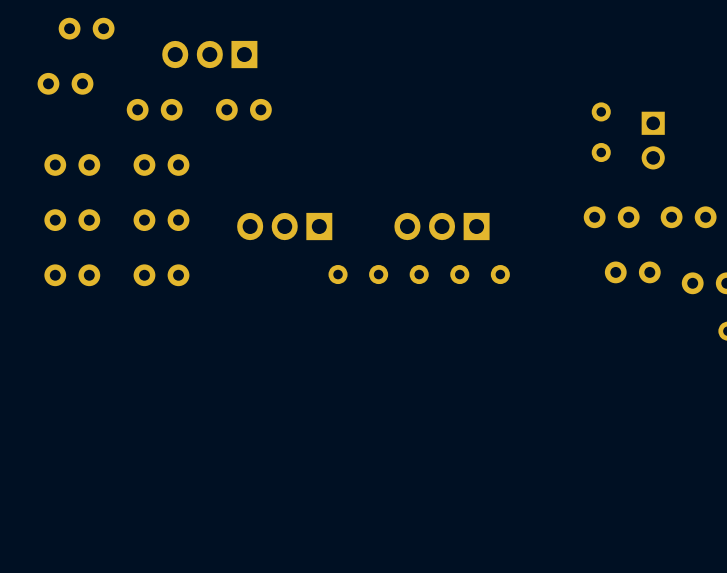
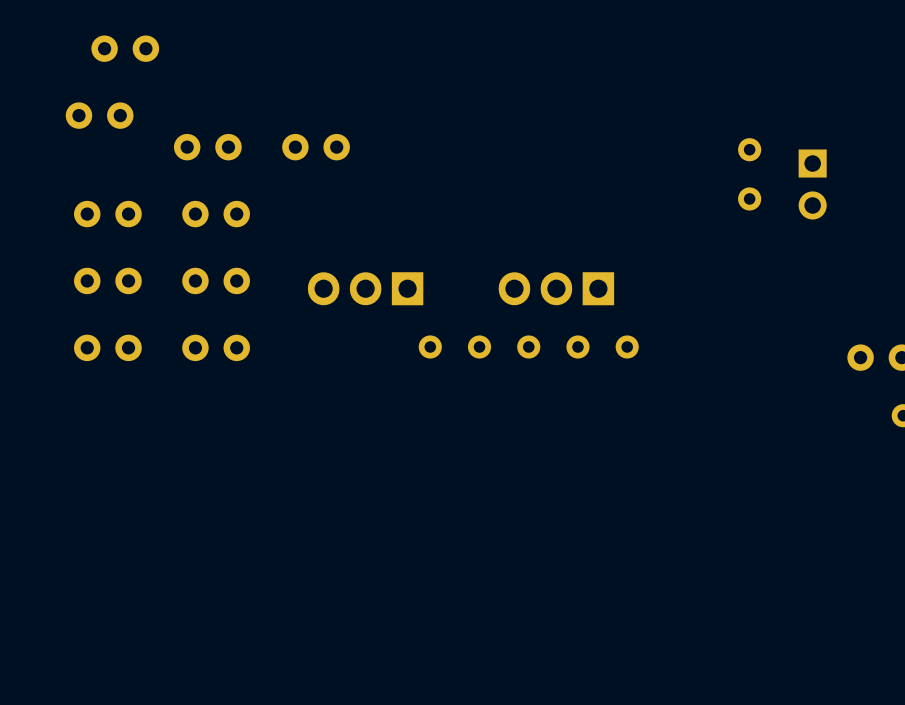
part: (209, 54) -> none
part: (611, 217) -> none
part: (688, 217) -> none
part: (632, 272) -> none

